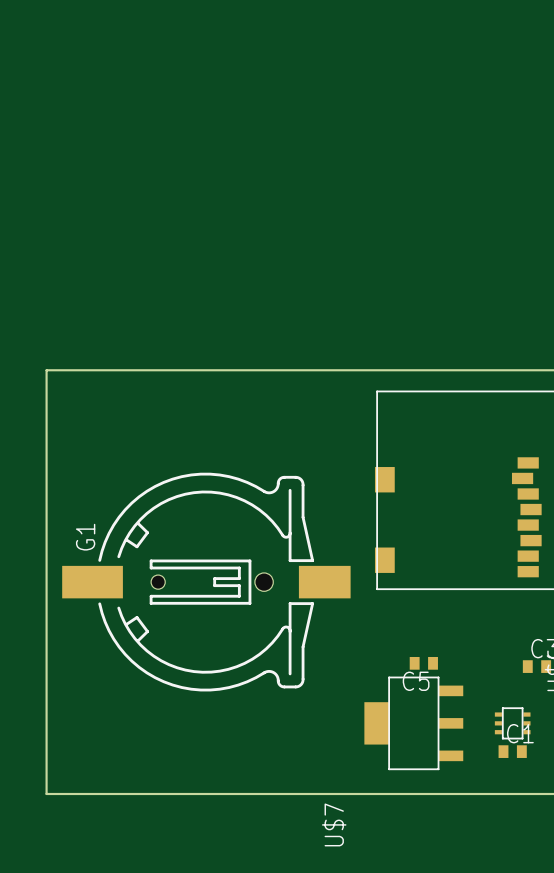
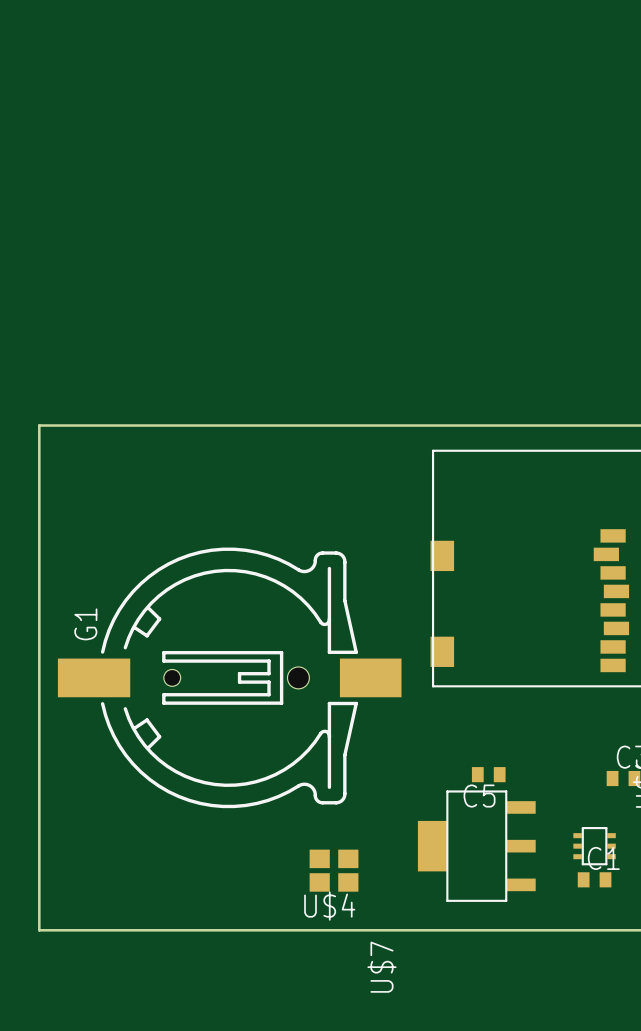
U$4: none -> (334, 870)

